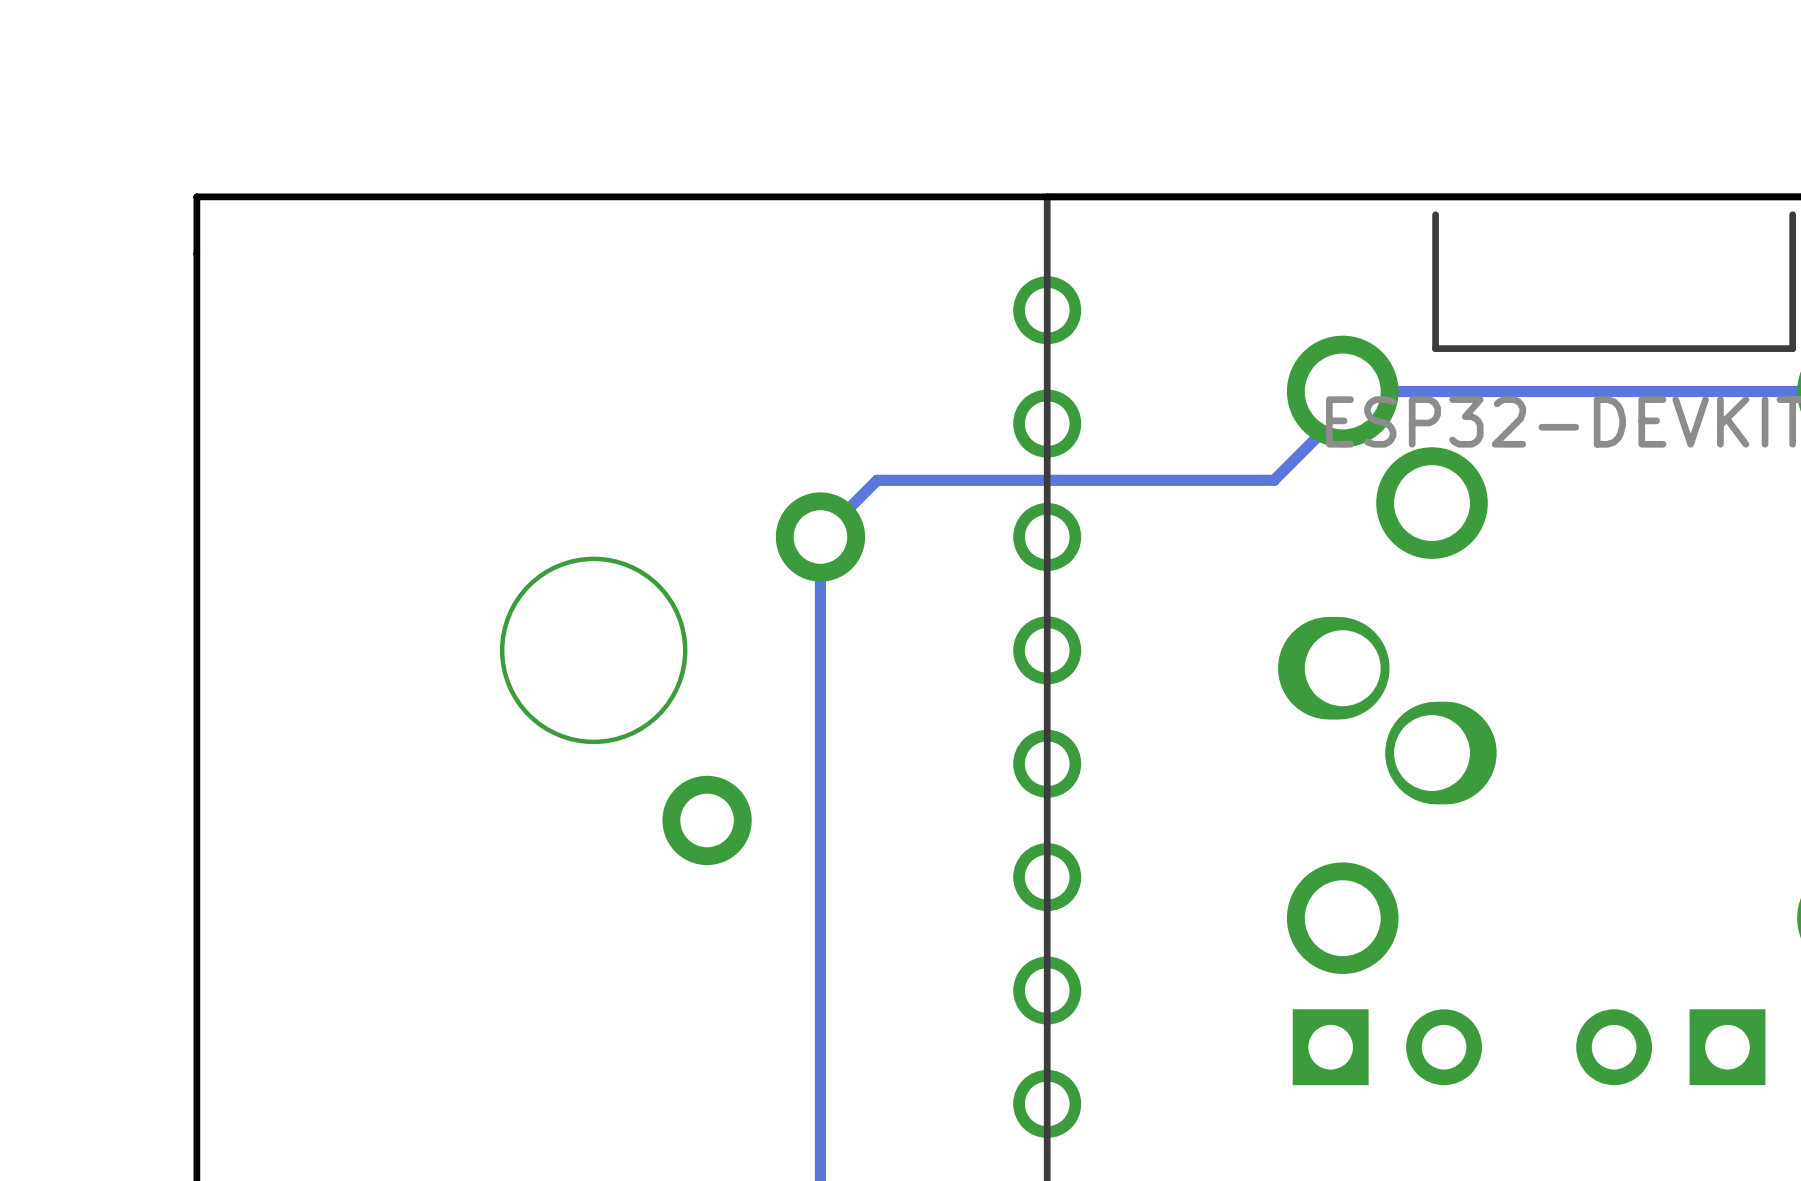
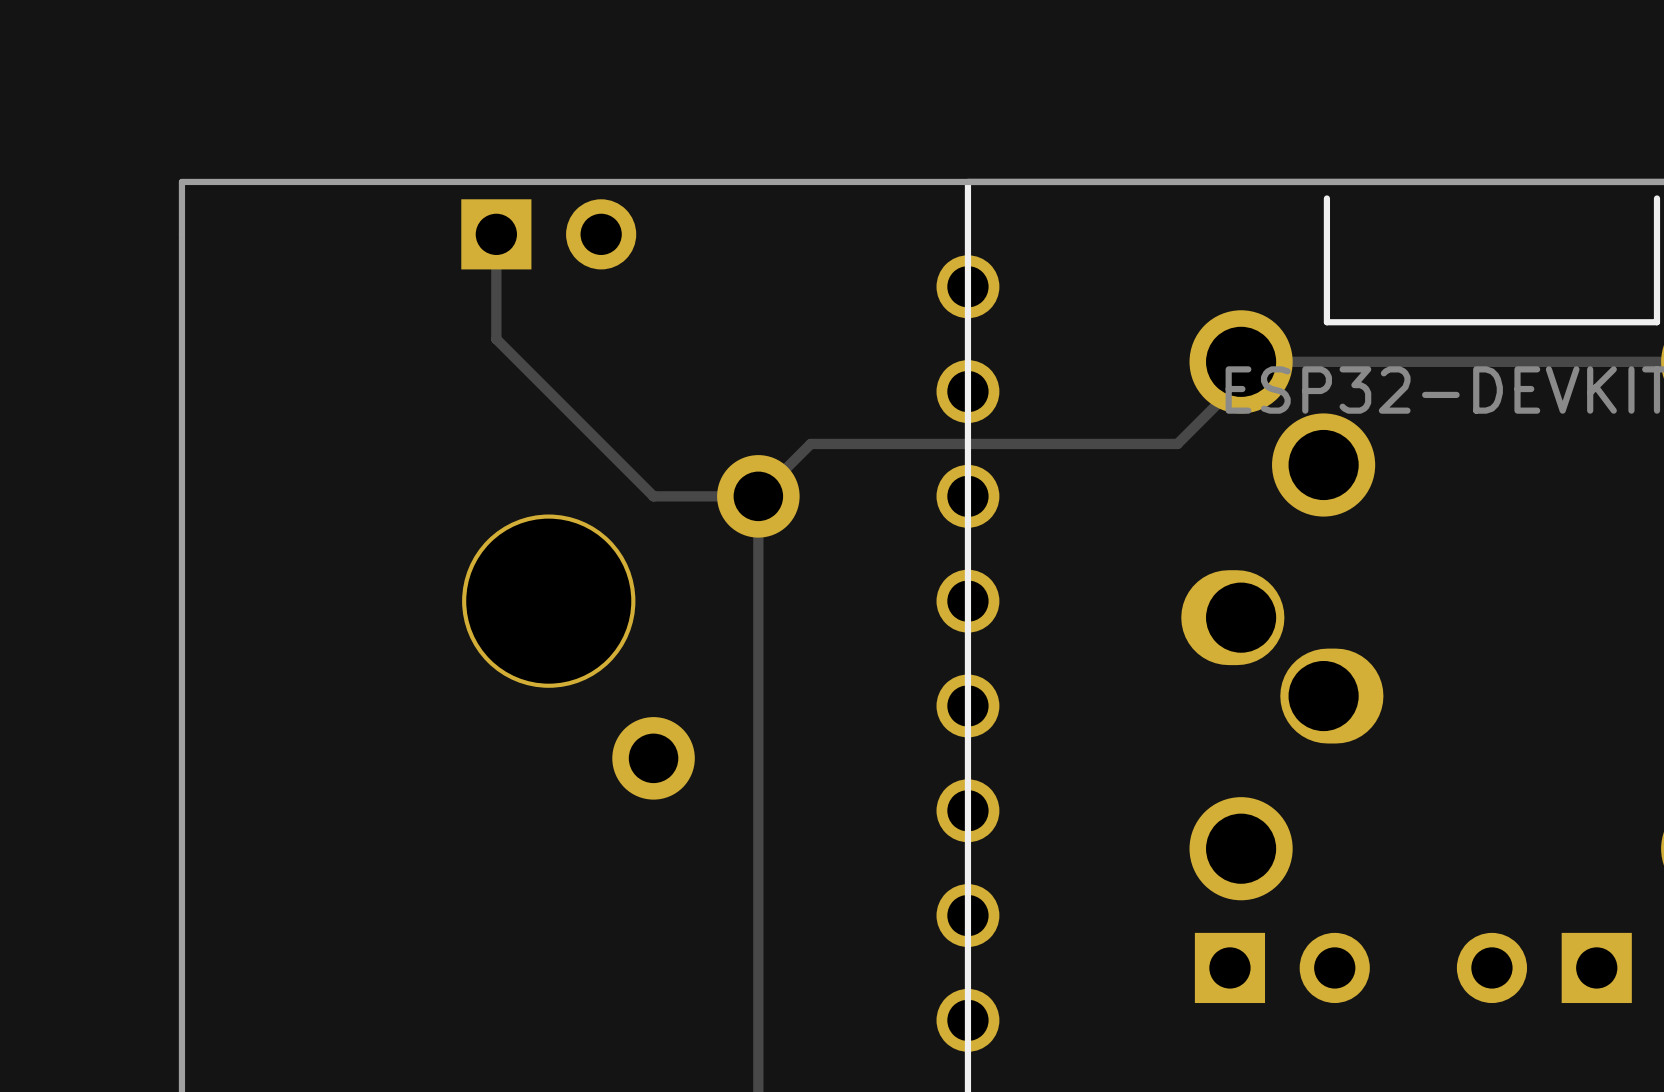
track: none -> (496, 234) (496, 339) (653, 496) (758, 496)
part: none -> (548, 234)

